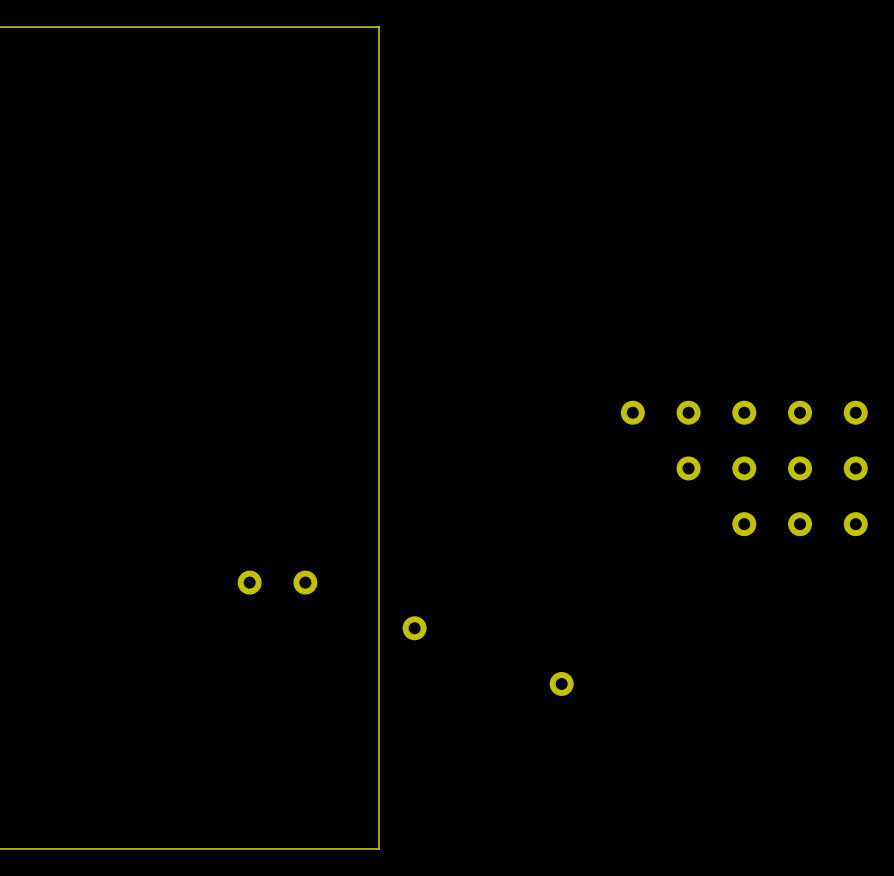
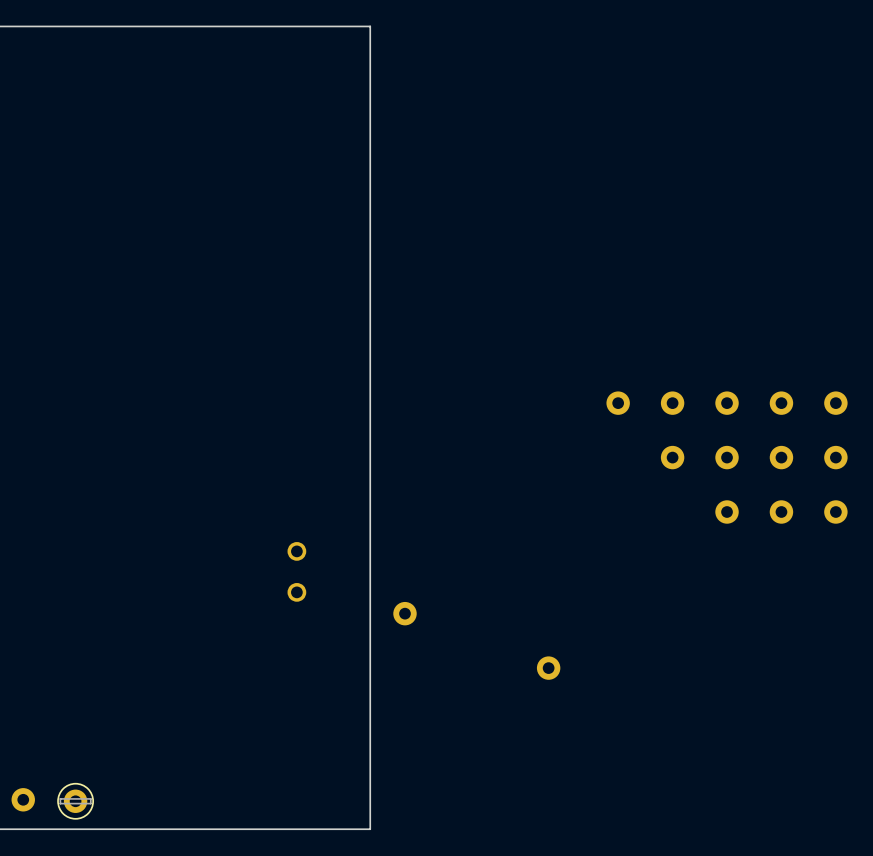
part footprint: [293, 570, 318, 595] -> [287, 542, 307, 602]
part side: top (249, 582) -> bottom (75, 801)
part: none -> (23, 799)

